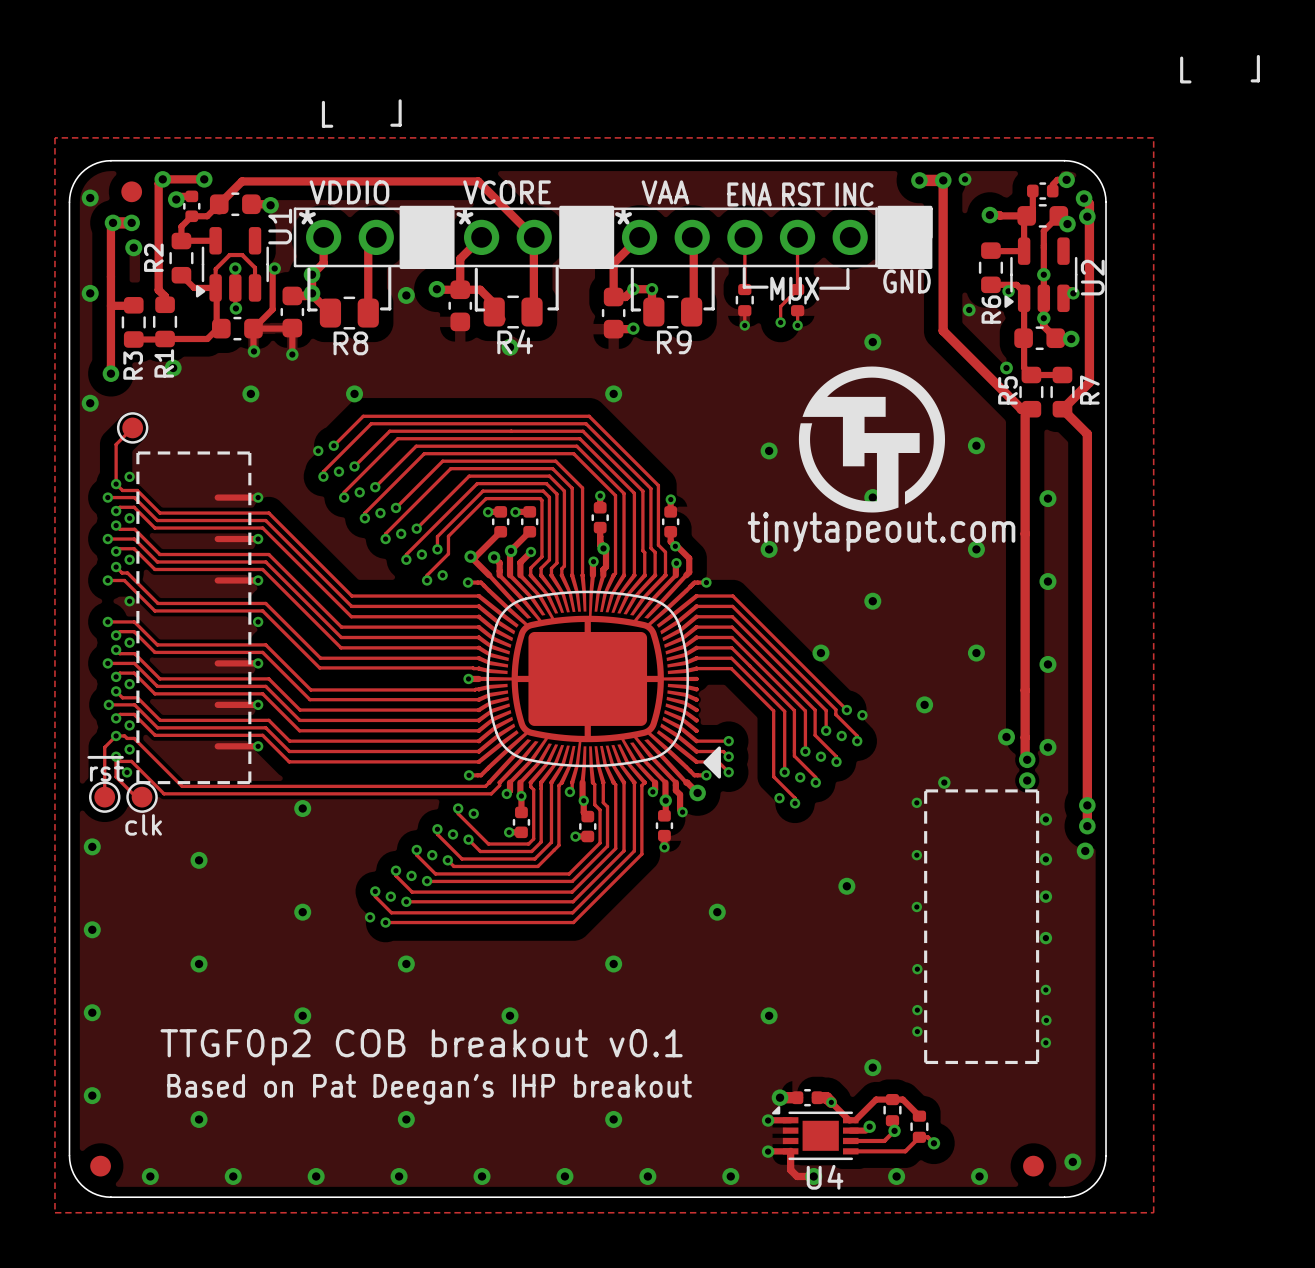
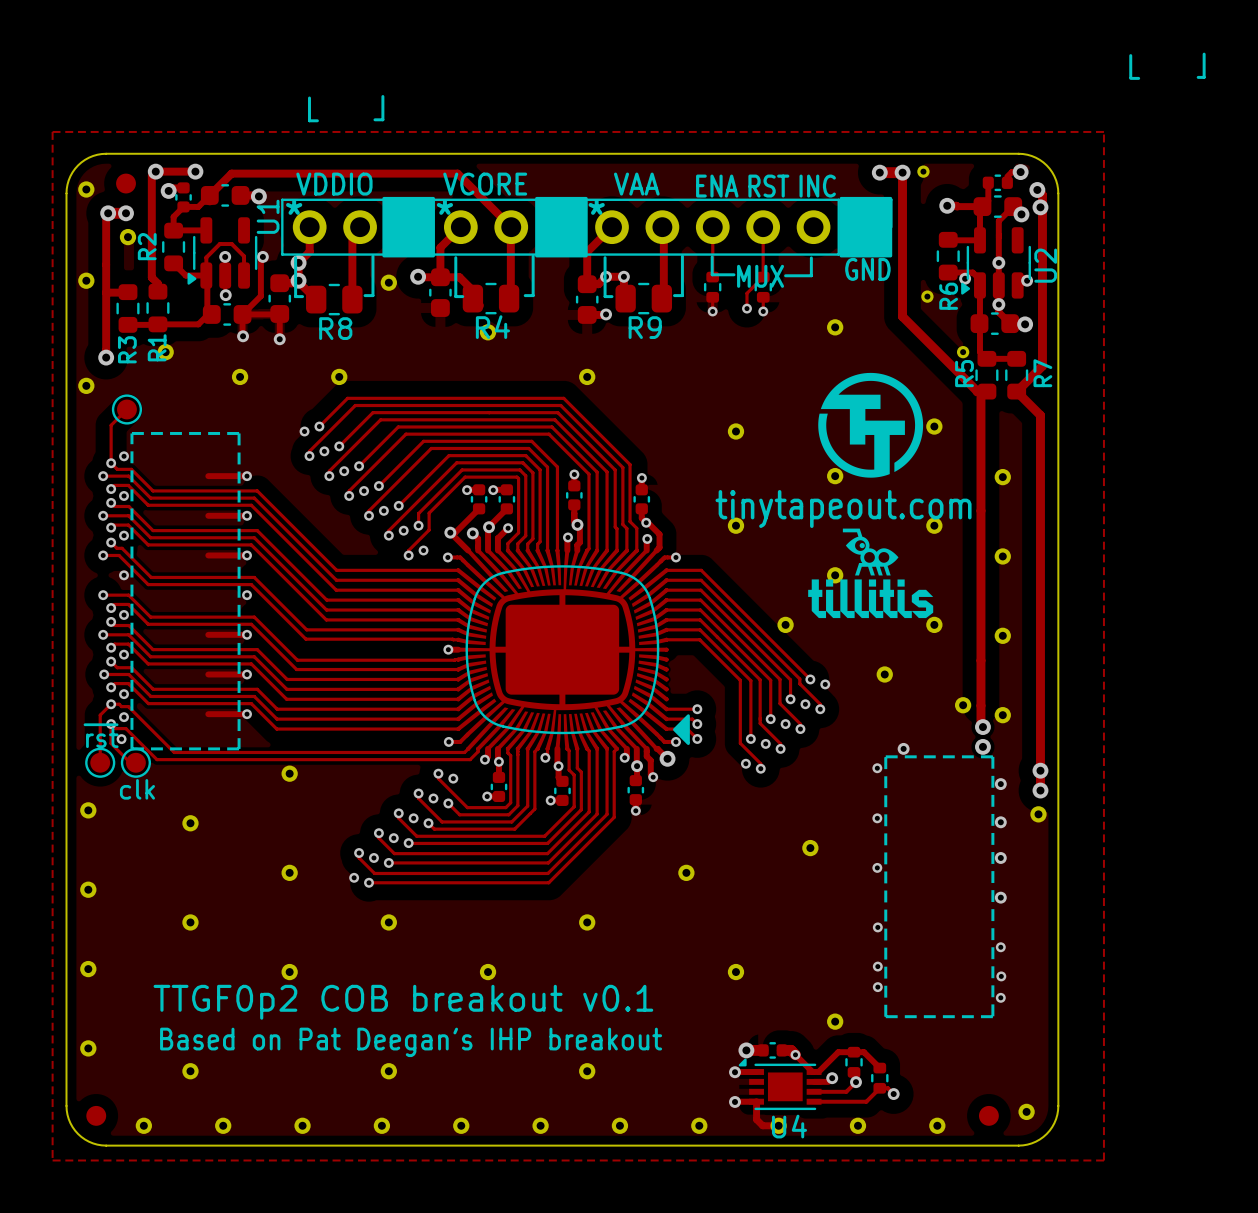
drawing: [798, 366, 946, 513] -> none
drawing: none -> [818, 372, 924, 478]
drawing: none -> [808, 528, 934, 619]

